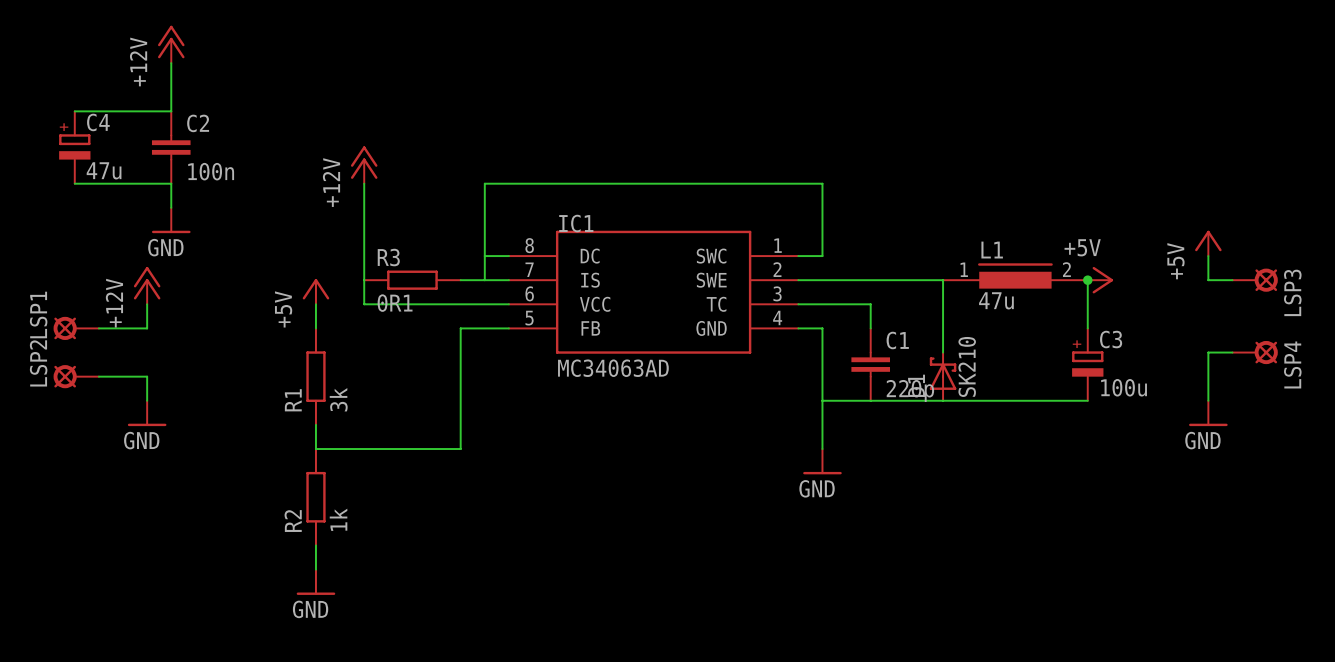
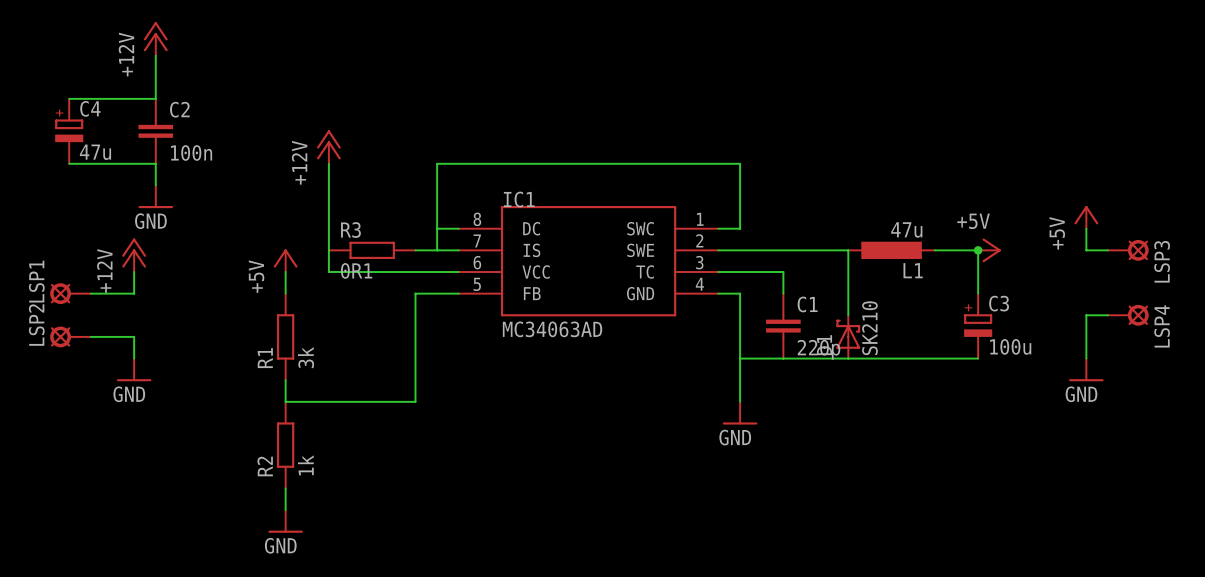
L1 name position: L1 (992, 250) -> L1 (913, 270)
L1 symbol: [943, 263, 1088, 289] -> [848, 241, 935, 260]
L1 value position: 47u (996, 300) -> 47u (906, 229)

